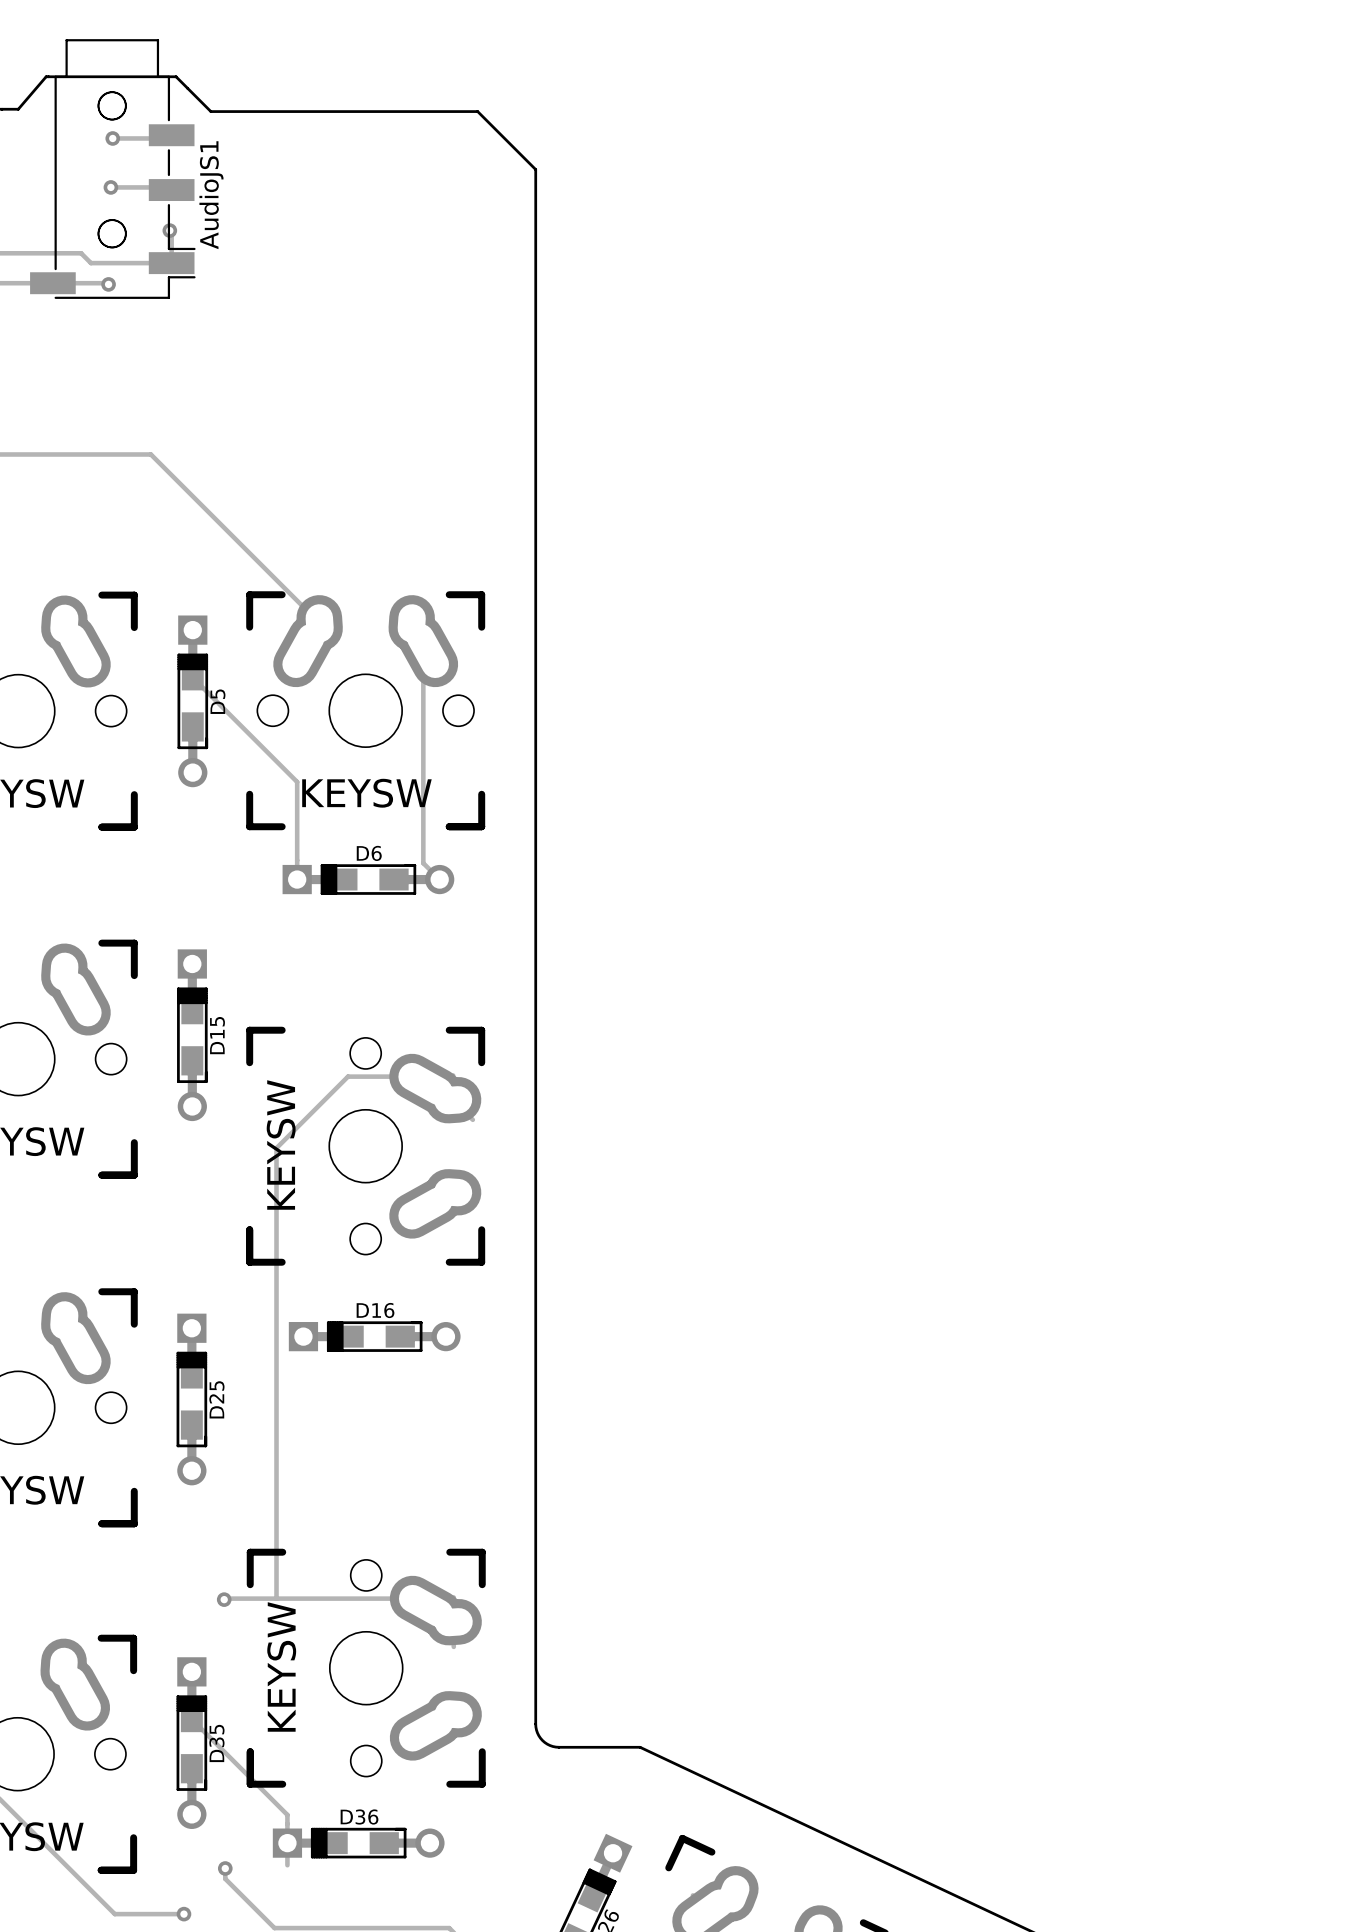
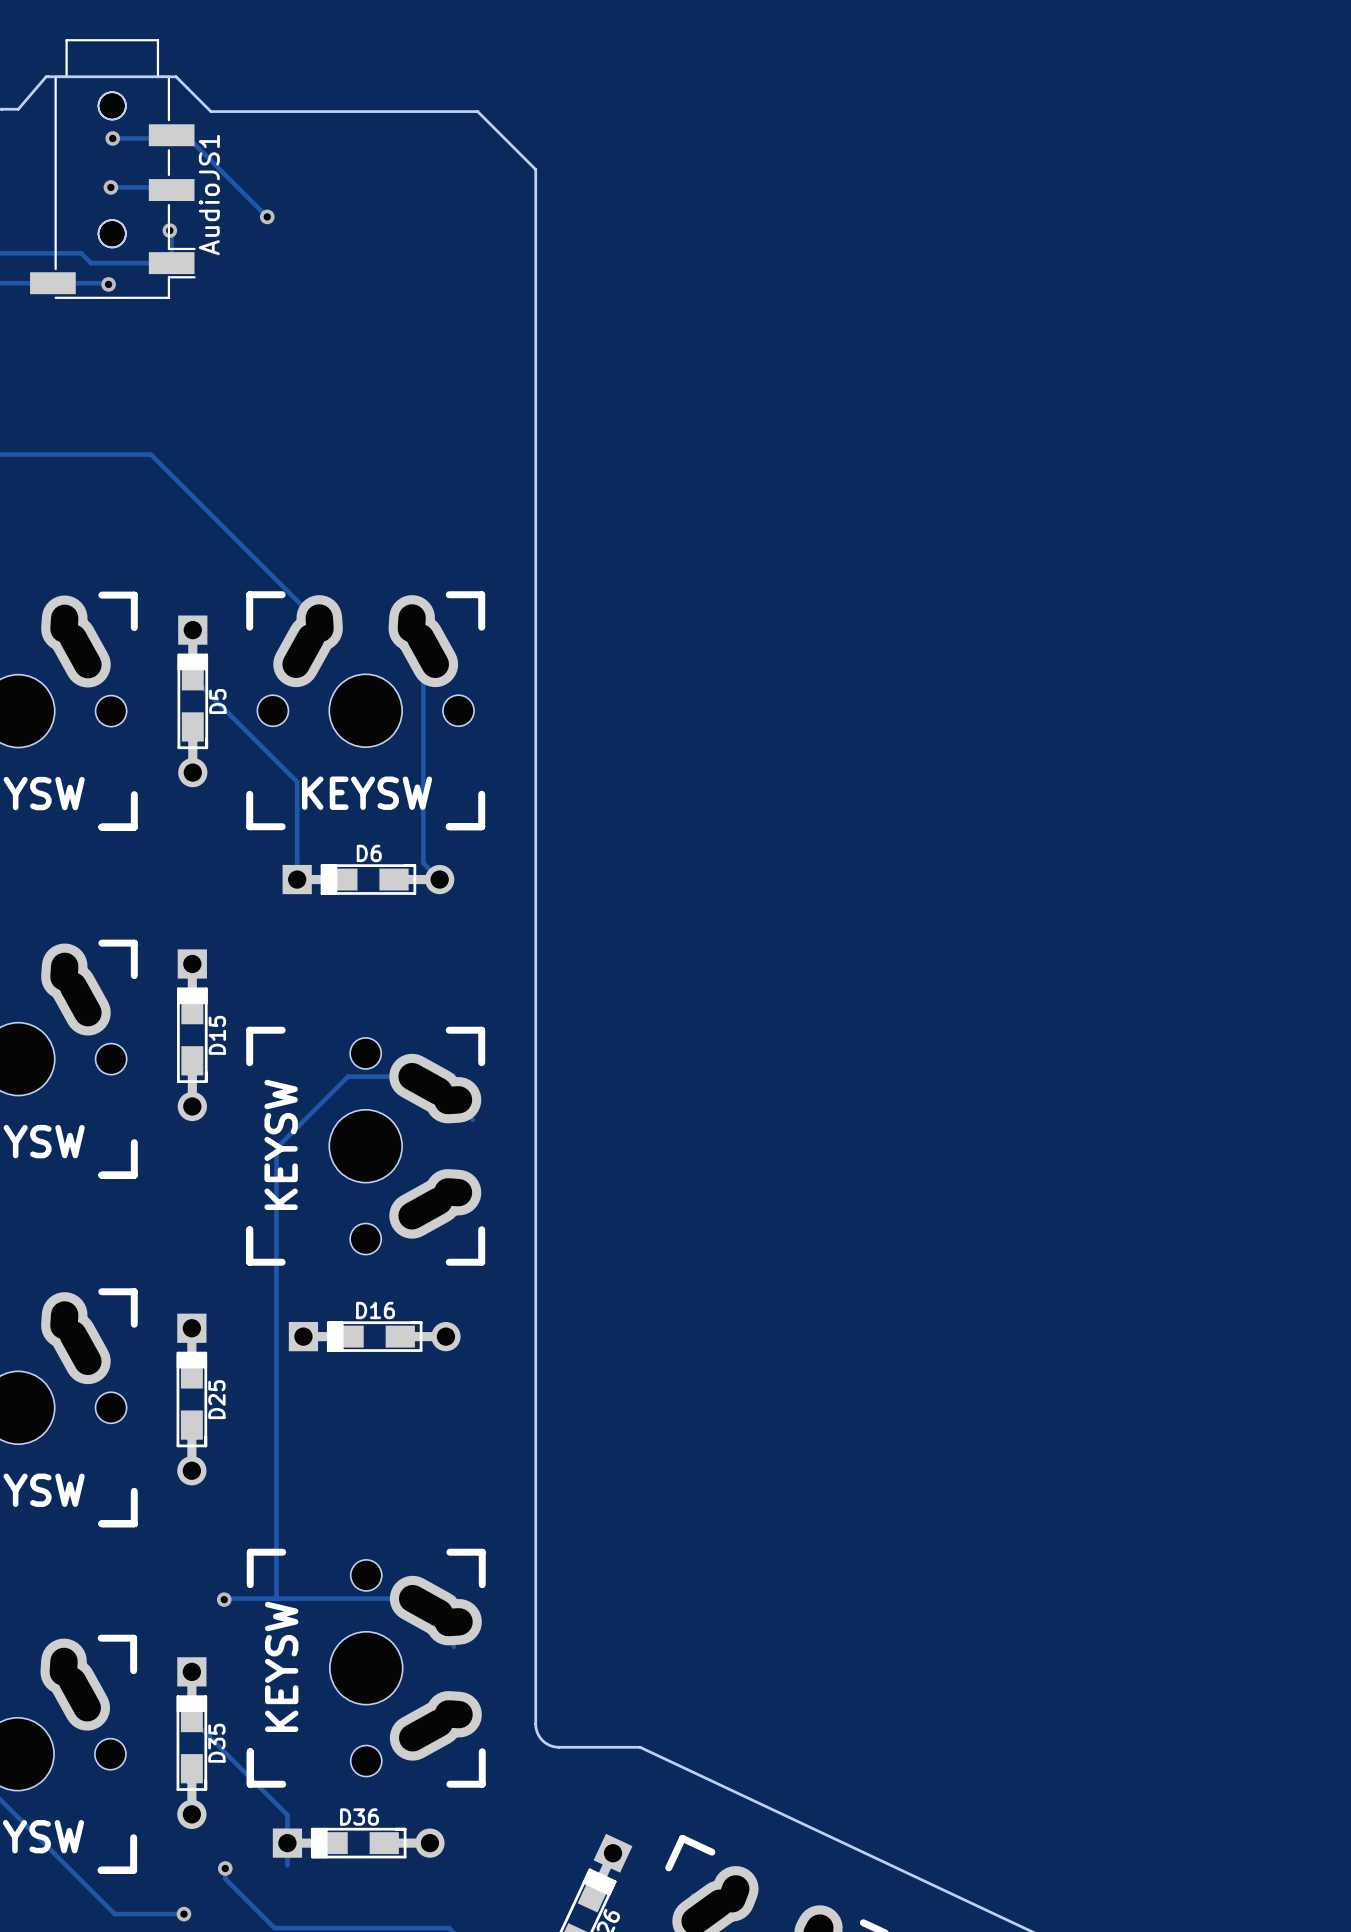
track: none -> (185, 135) (267, 216)
via: none -> (267, 216)

